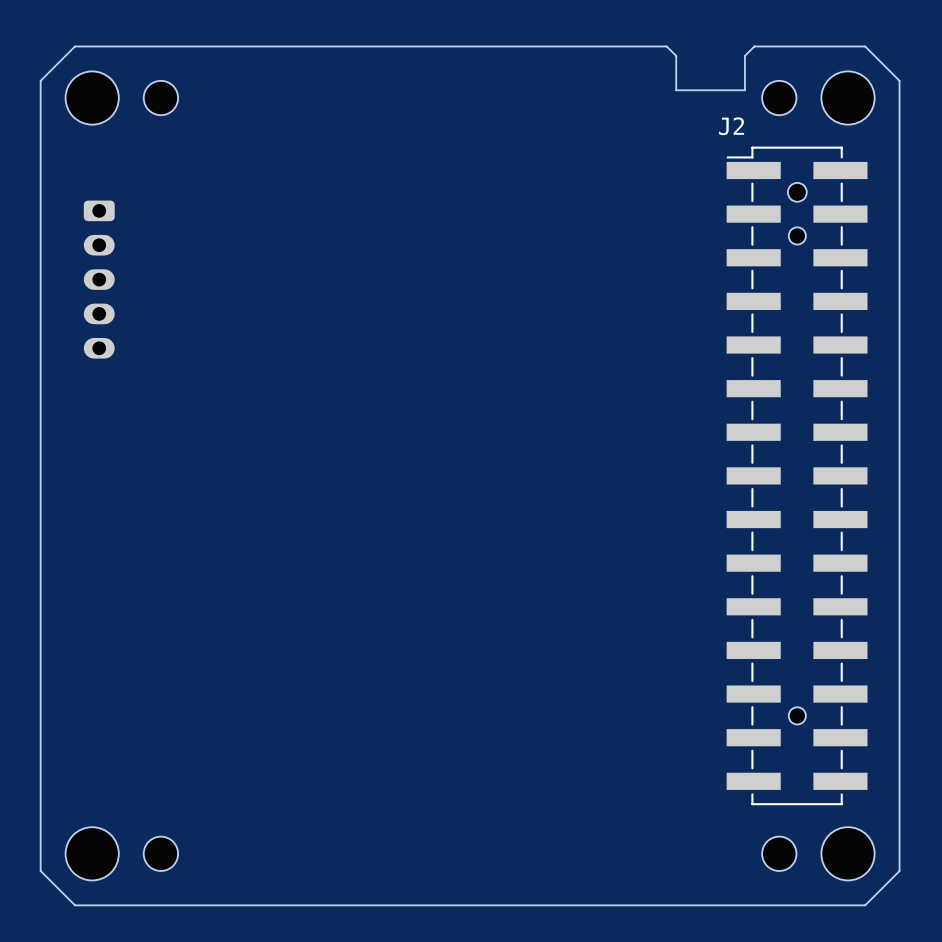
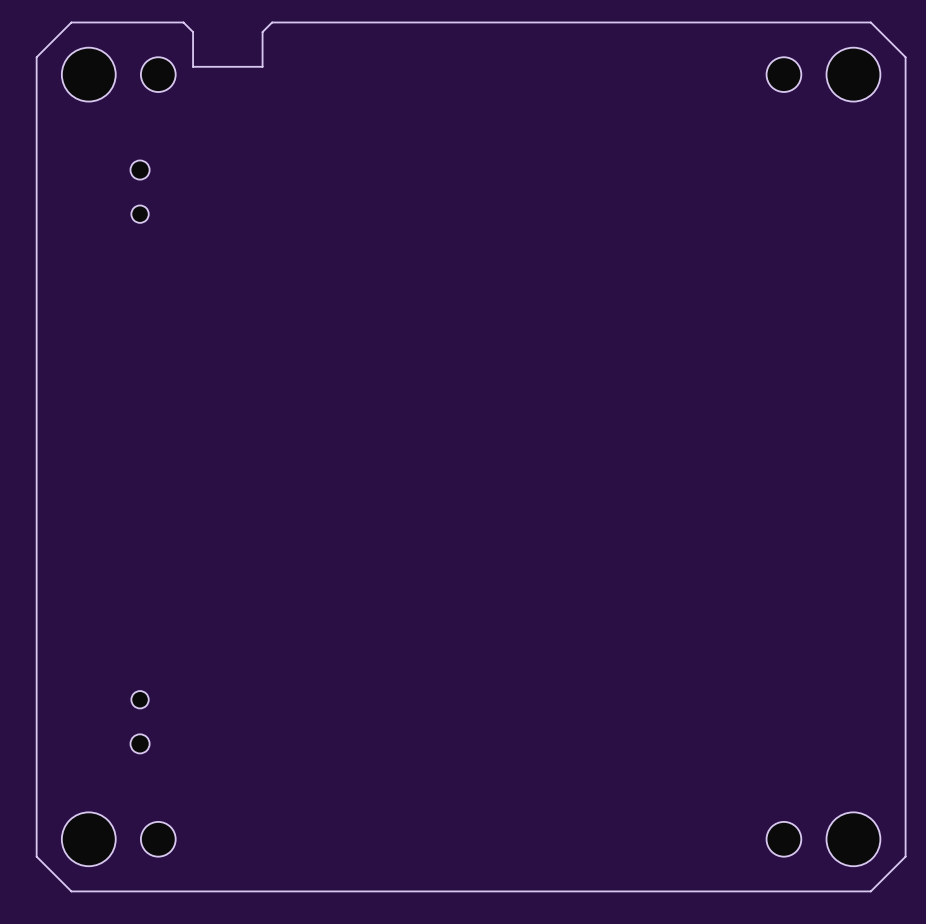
board edge: (273, 46) (185, 46) -> (272, 22) (262, 32) (262, 66) (193, 66) (193, 32) (183, 22)
board edge: (754, 46) (744, 55) (744, 90) (676, 90) (676, 55) (666, 46) -> (758, 22) (670, 22)
part: none -> (140, 170)
part: (797, 192) -> none
part: none -> (140, 214)
part: (797, 235) -> none
part: (99, 279) -> none
J2: (797, 475) -> none
part: none -> (140, 699)
part: (797, 715) -> none
part: none -> (140, 743)

